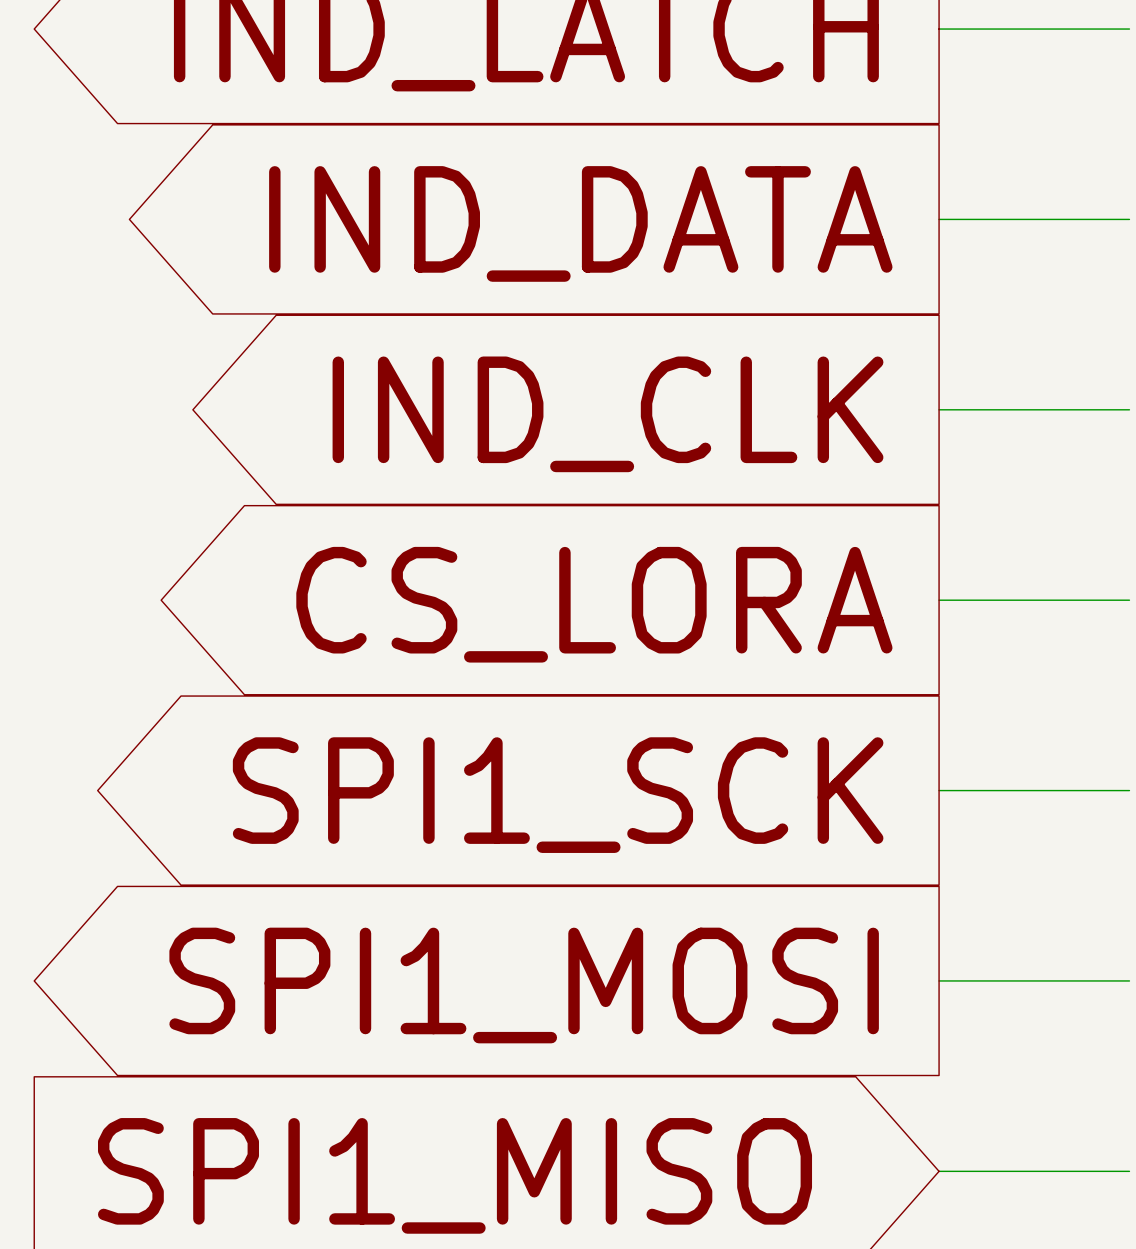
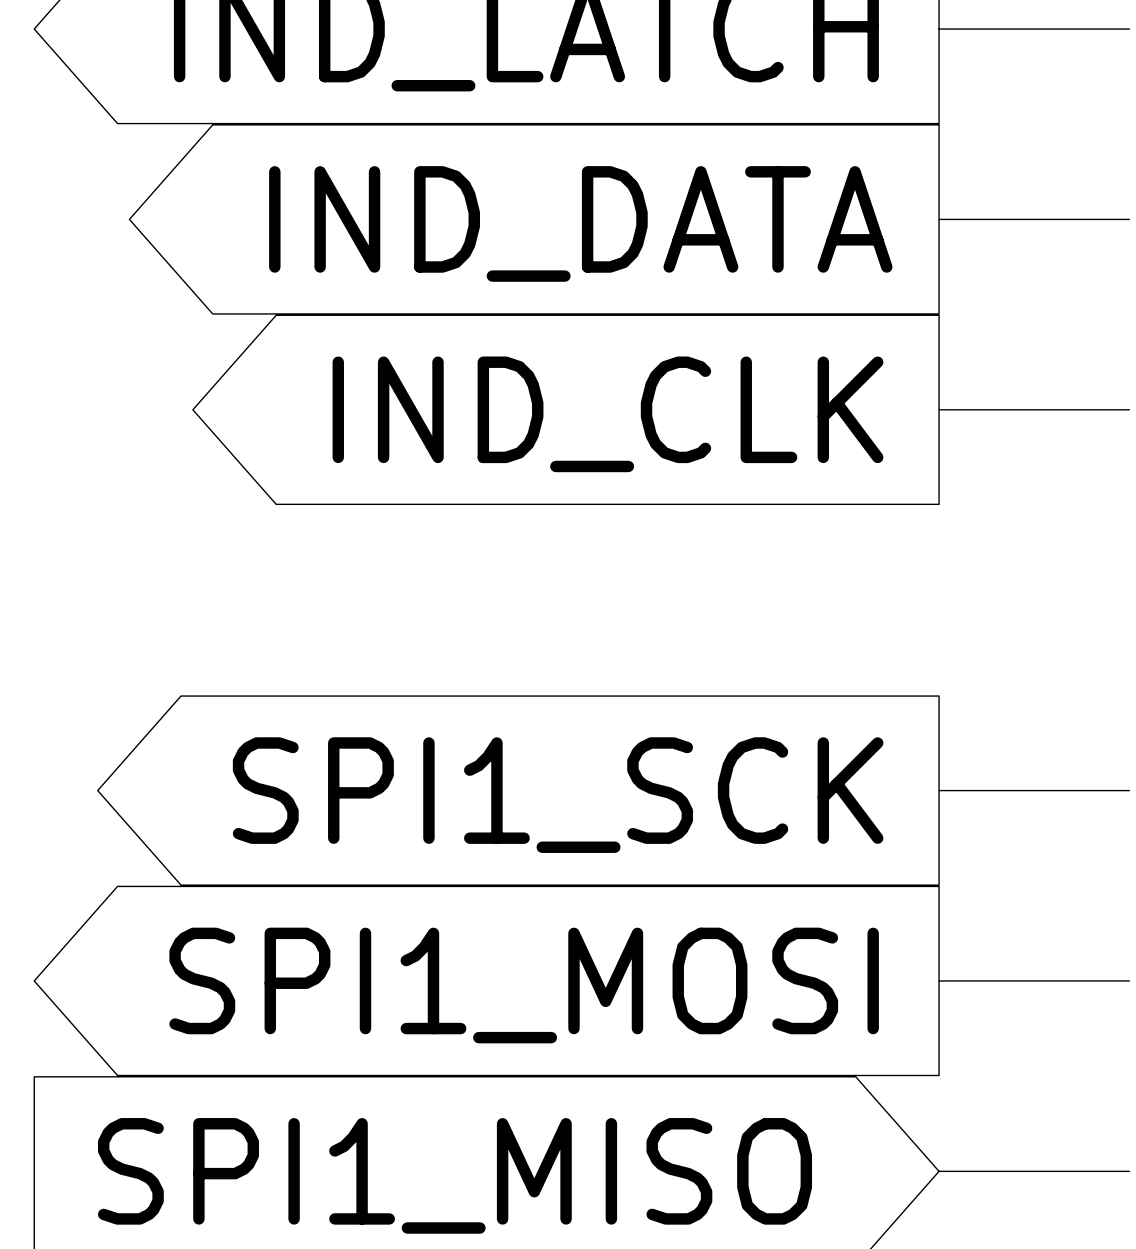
wire: (939, 600) (1129, 600) -> none
global label: CS_LORA (594, 604) -> none

